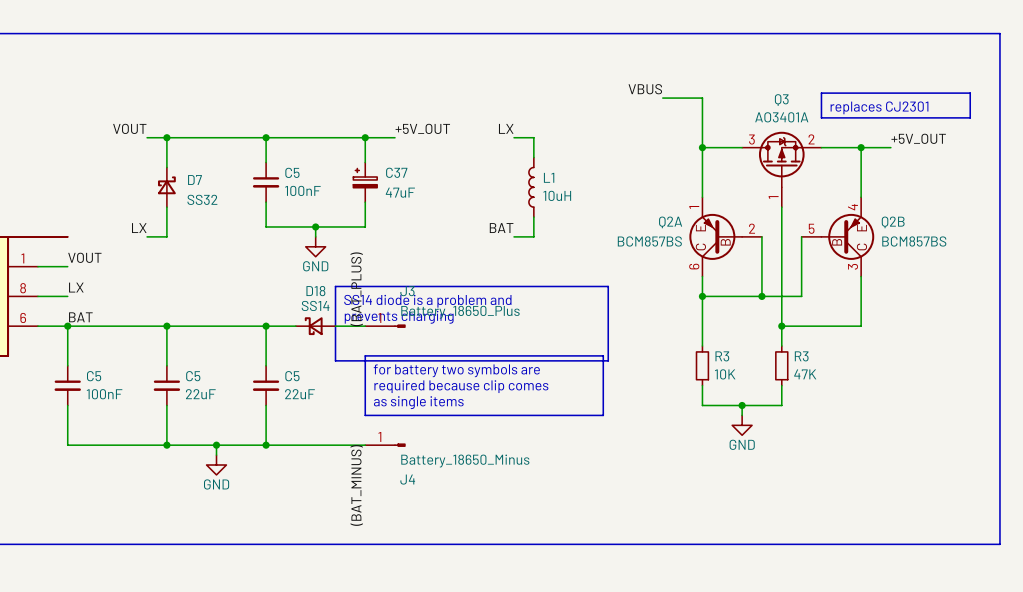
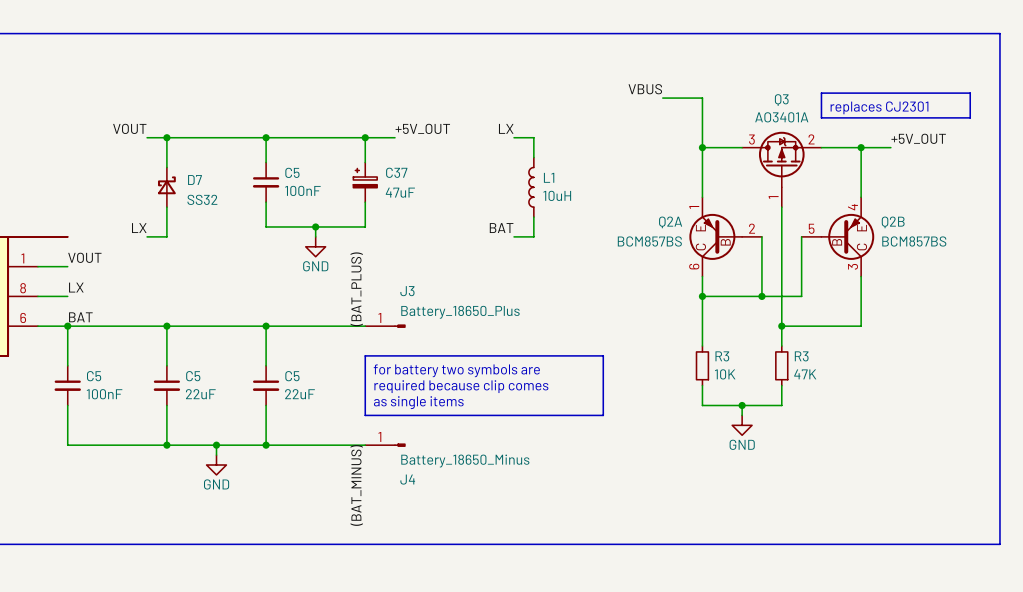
line: (335, 286) (608, 286) (608, 360) (335, 360) (335, 286) -> none
text: SS14 diode is a problem and (427, 301) -> none
text: prevents charging (399, 317) -> none
D18: SS14 (315, 326) -> none

